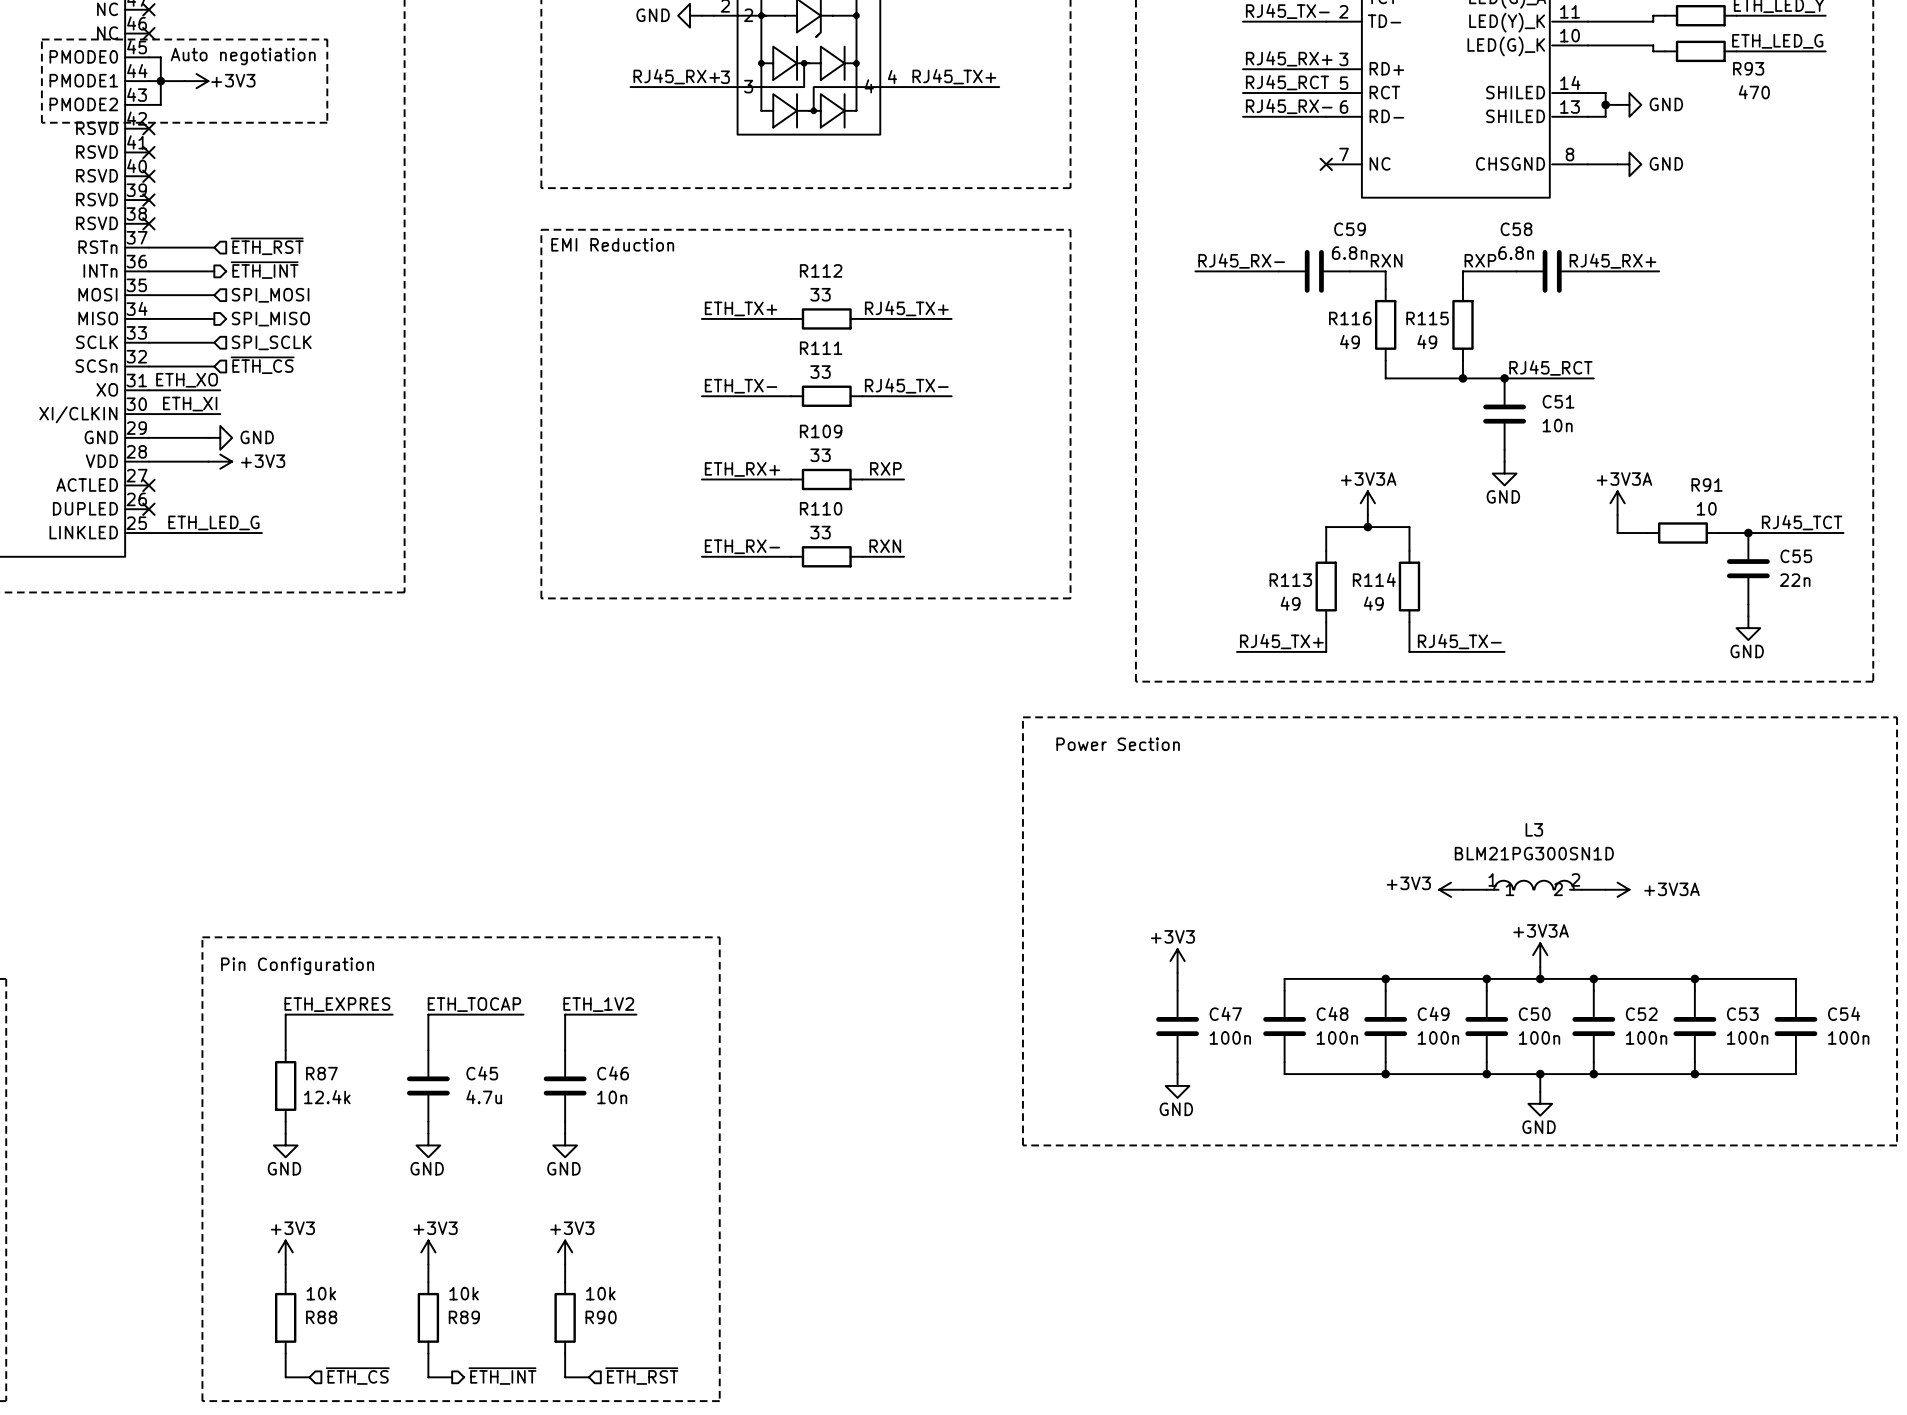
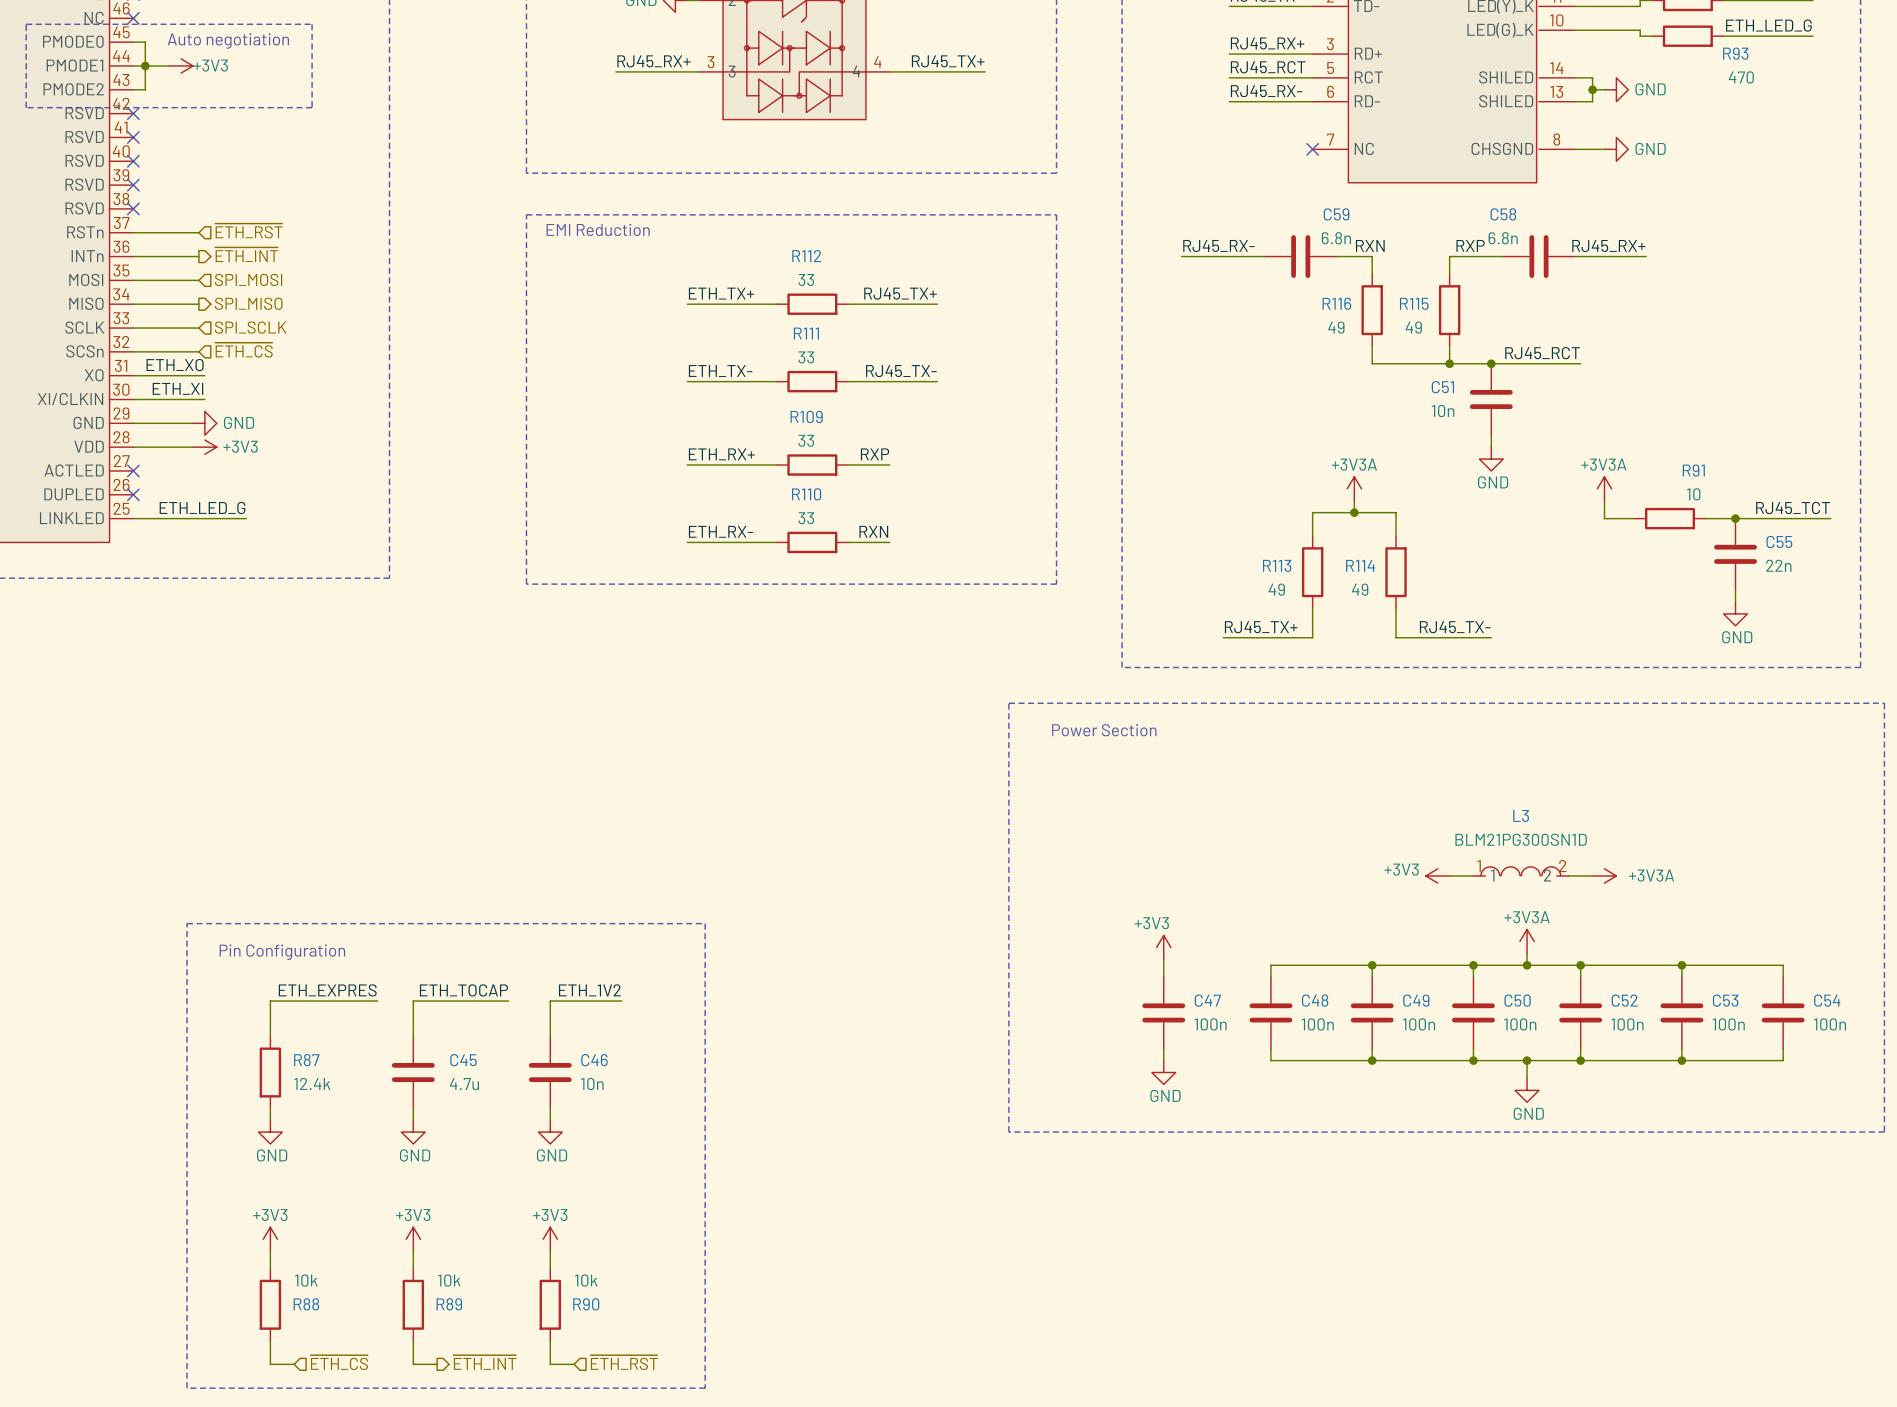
C51 name position: C51 (1558, 401) -> C51 (1442, 387)
C51 value position: 10n (1557, 425) -> 10n (1443, 410)

